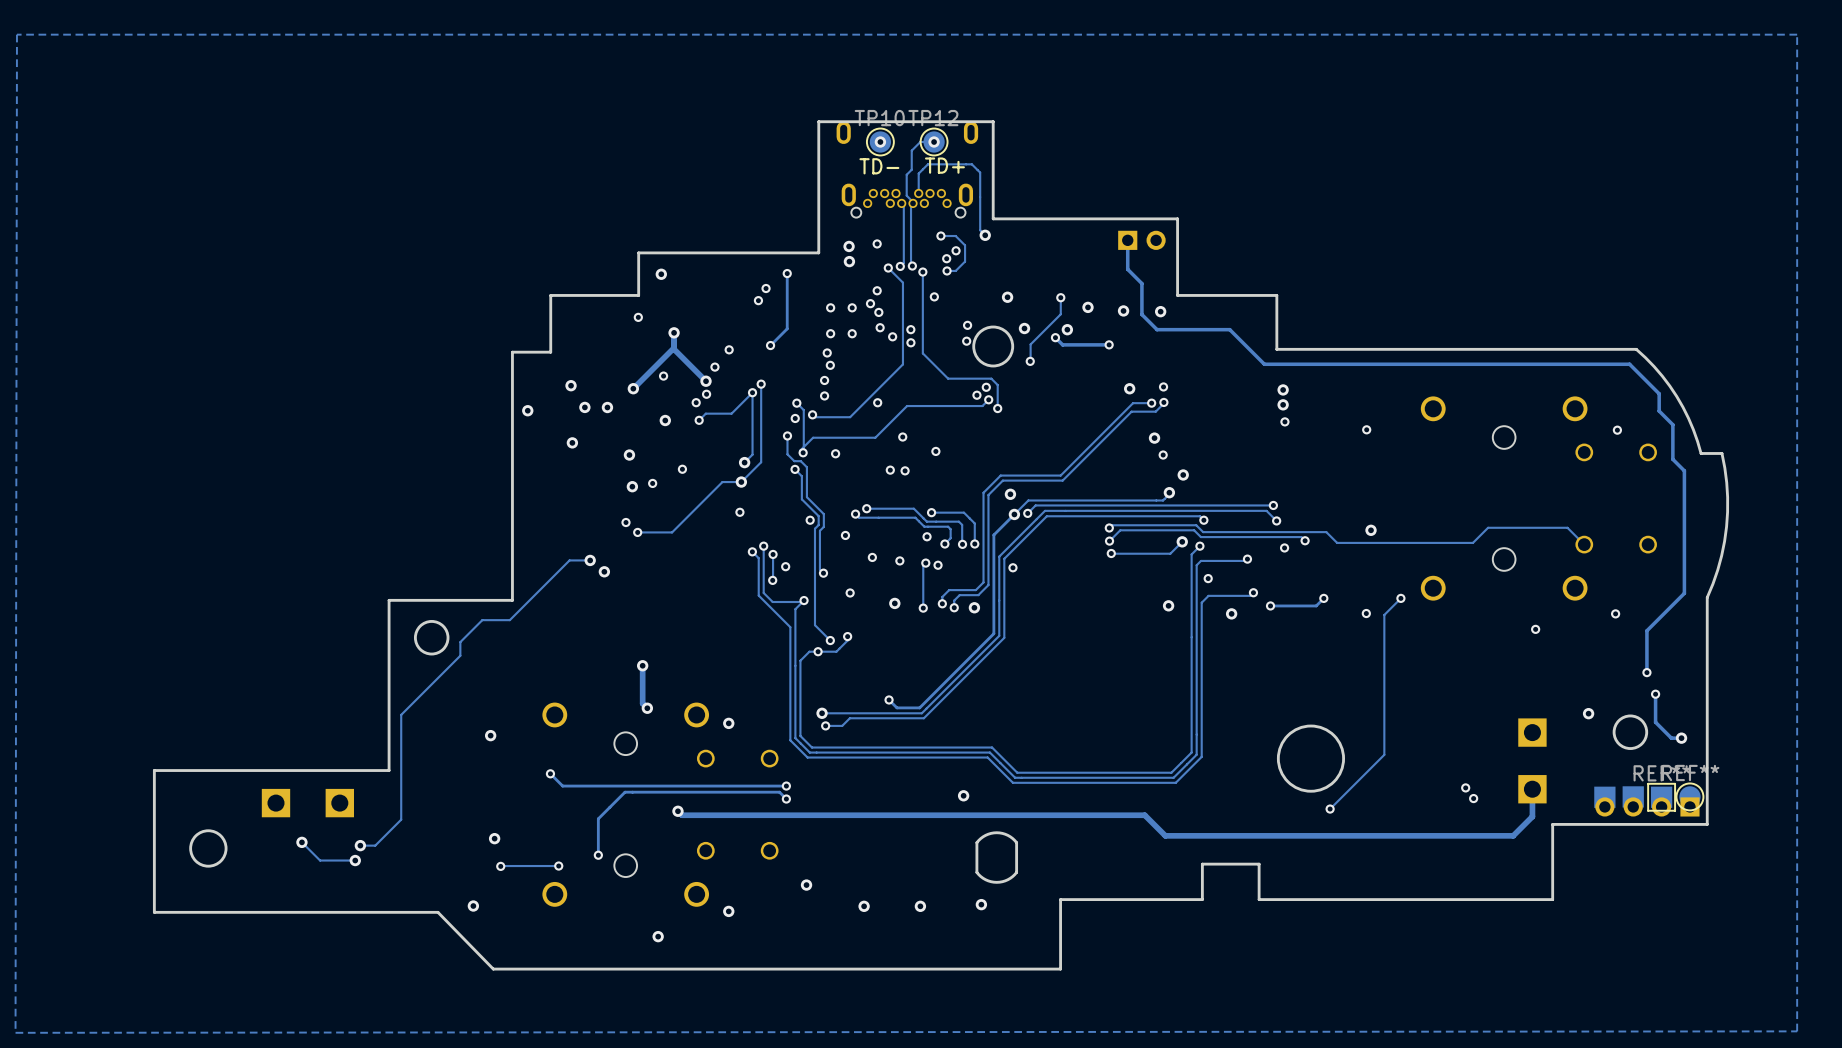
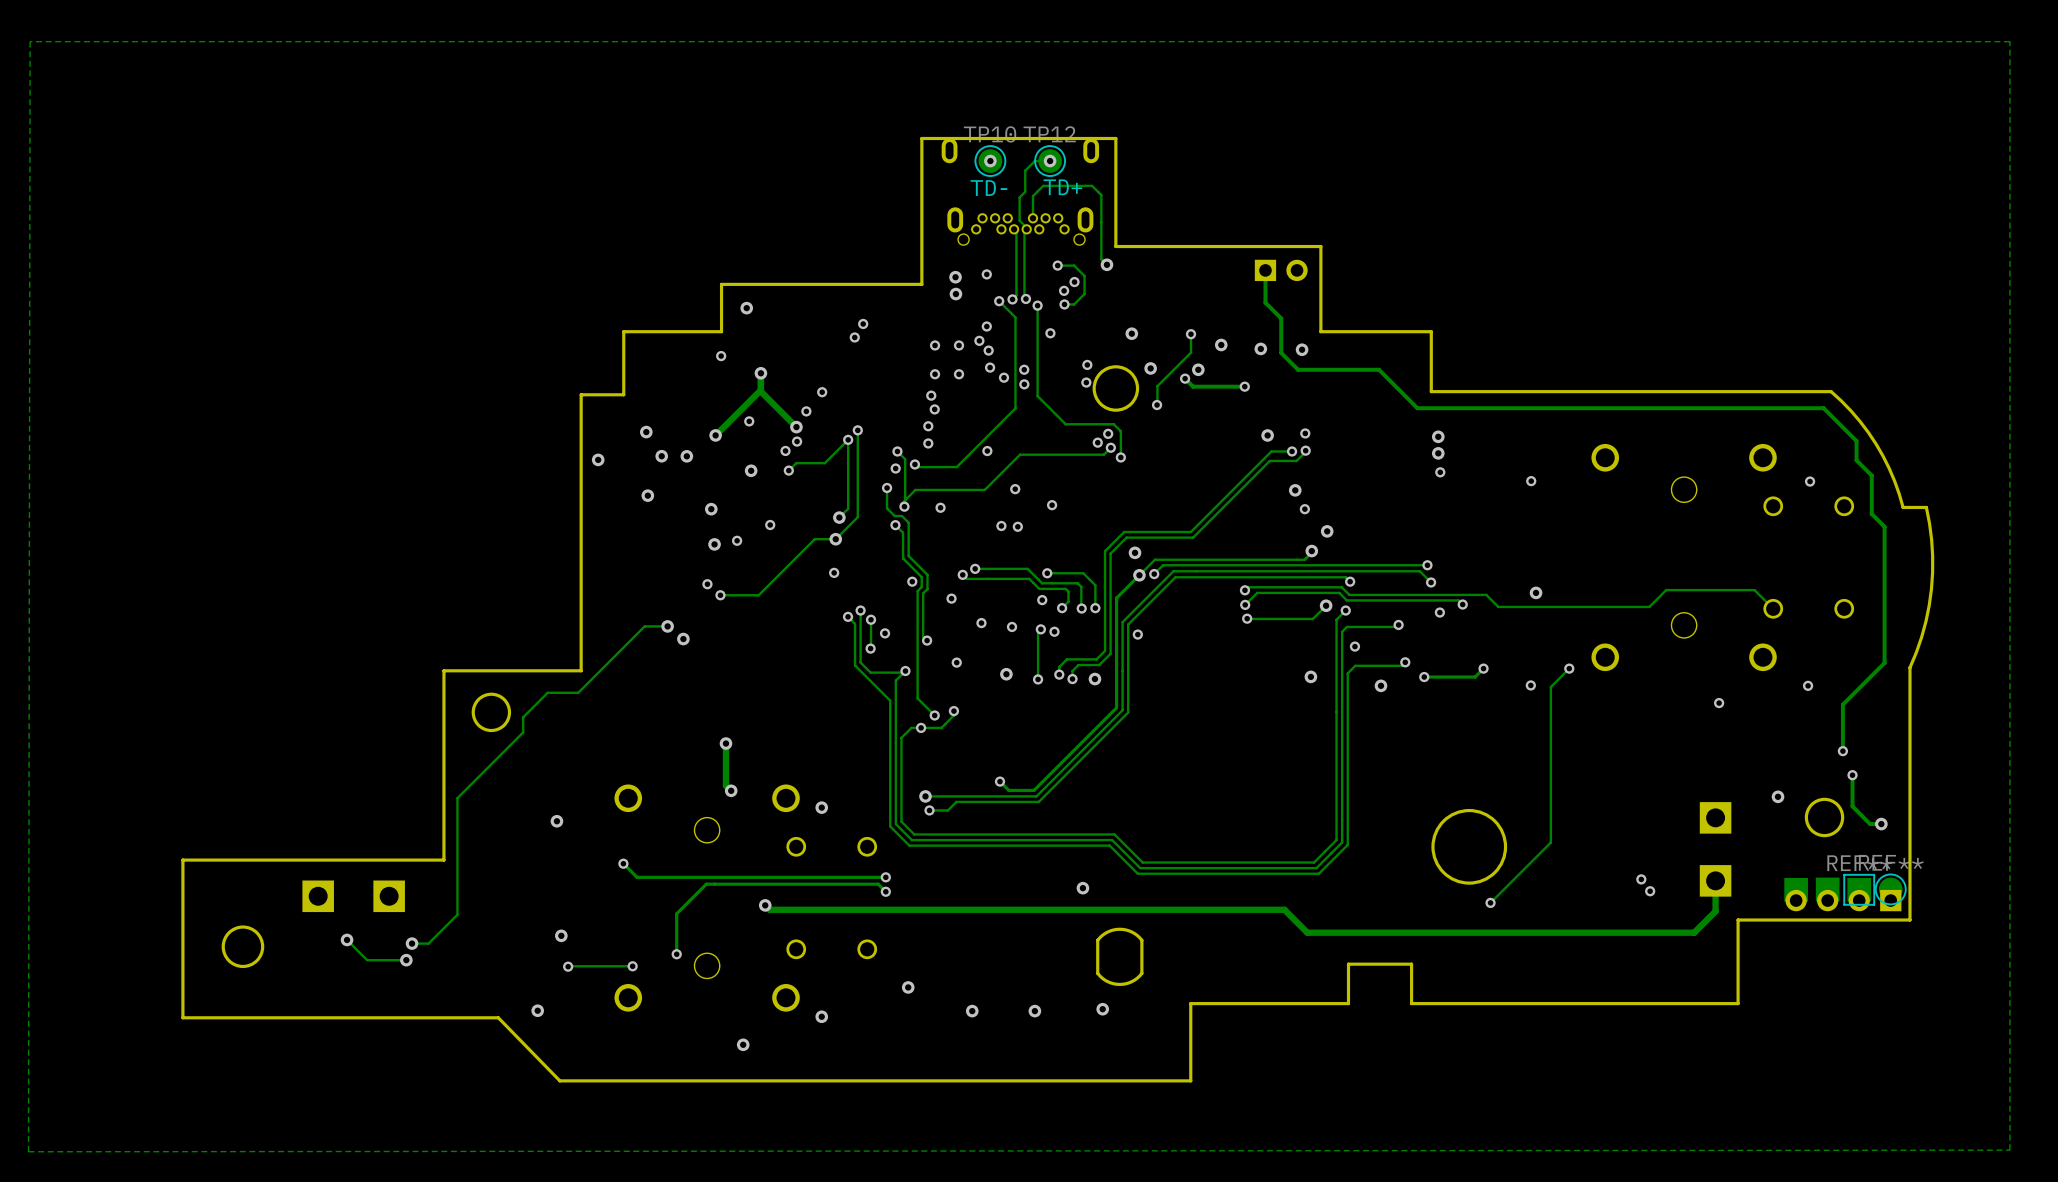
track: (787, 273) (787, 328) (770, 345) -> none
via: (787, 273) -> none
via: (770, 345) -> none

